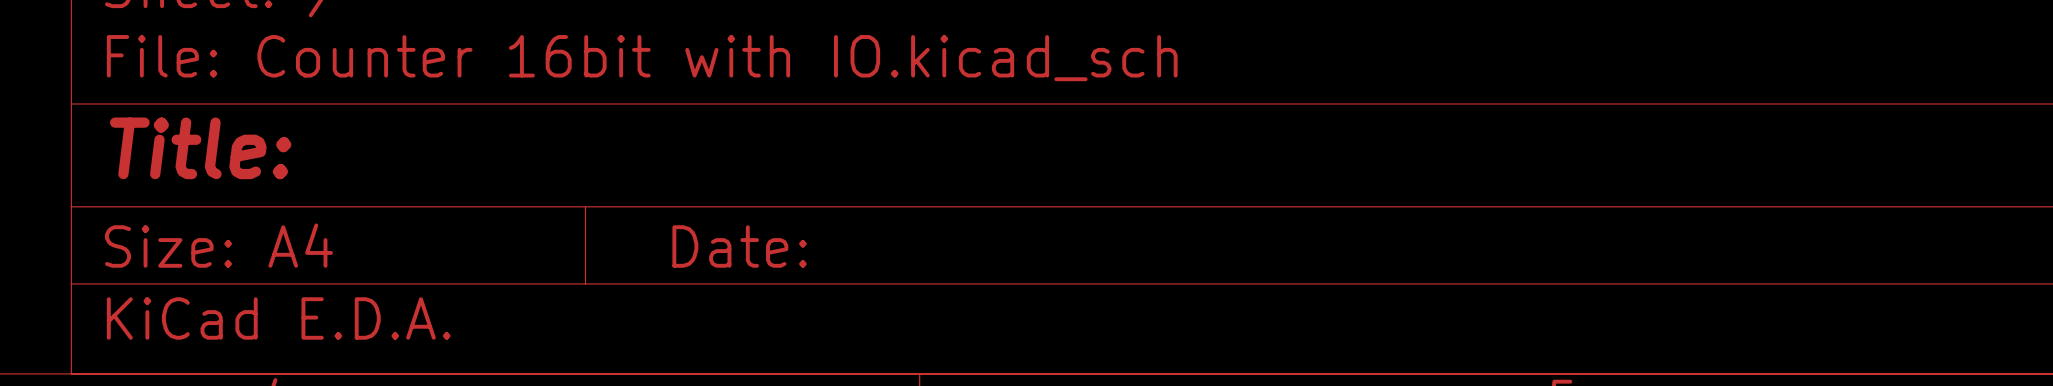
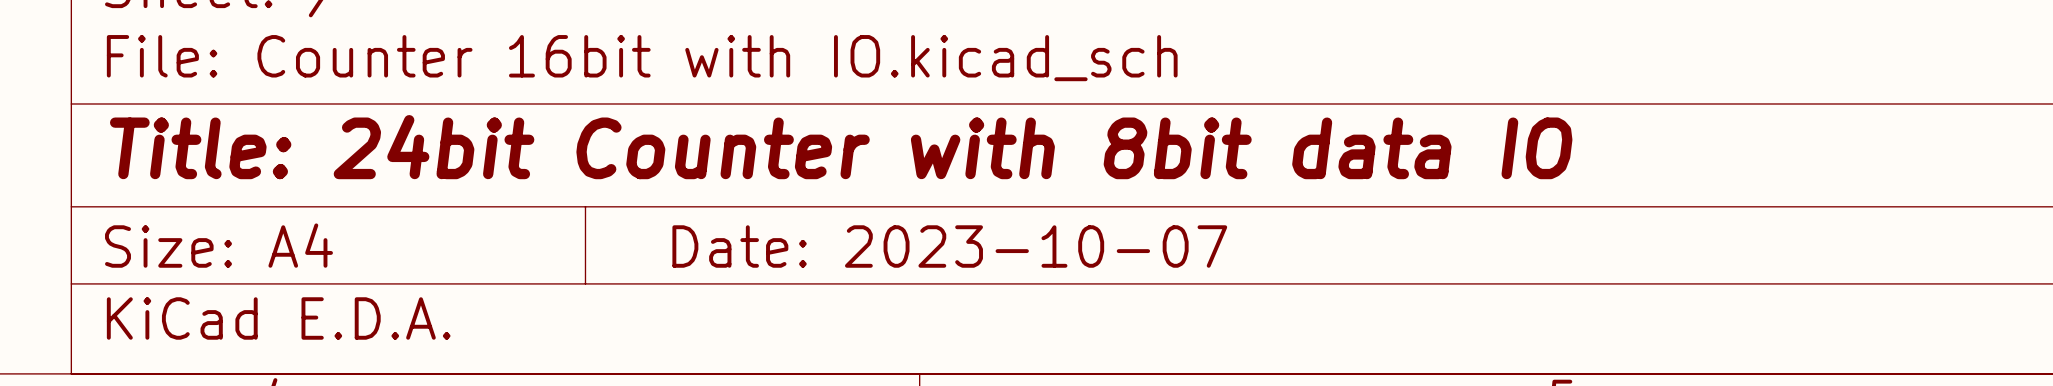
title block: Title: (200, 148) -> Title: 24bit Counter with 8bit data IO (841, 147)
title block: Date: (739, 246) -> Date: 2023-10-07 (949, 246)

